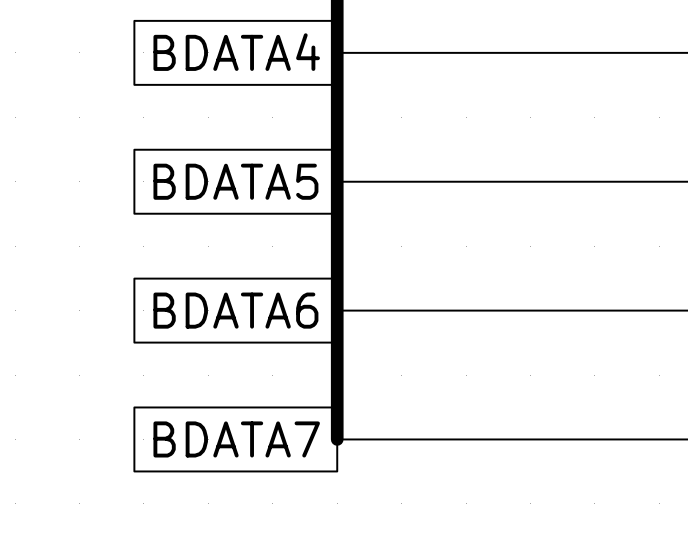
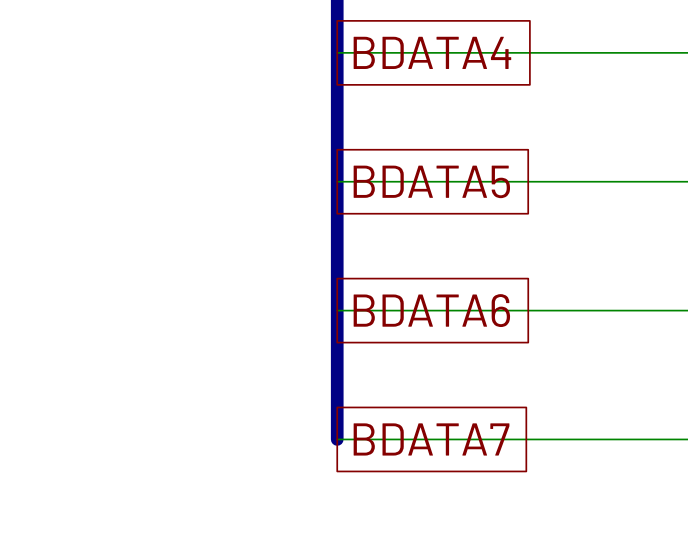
global label rotation: 0° (236, 52) -> 180° (432, 52)
global label rotation: 0° (235, 181) -> 180° (431, 181)
global label rotation: 0° (235, 310) -> 180° (431, 310)
global label rotation: 0° (236, 439) -> 180° (431, 439)

